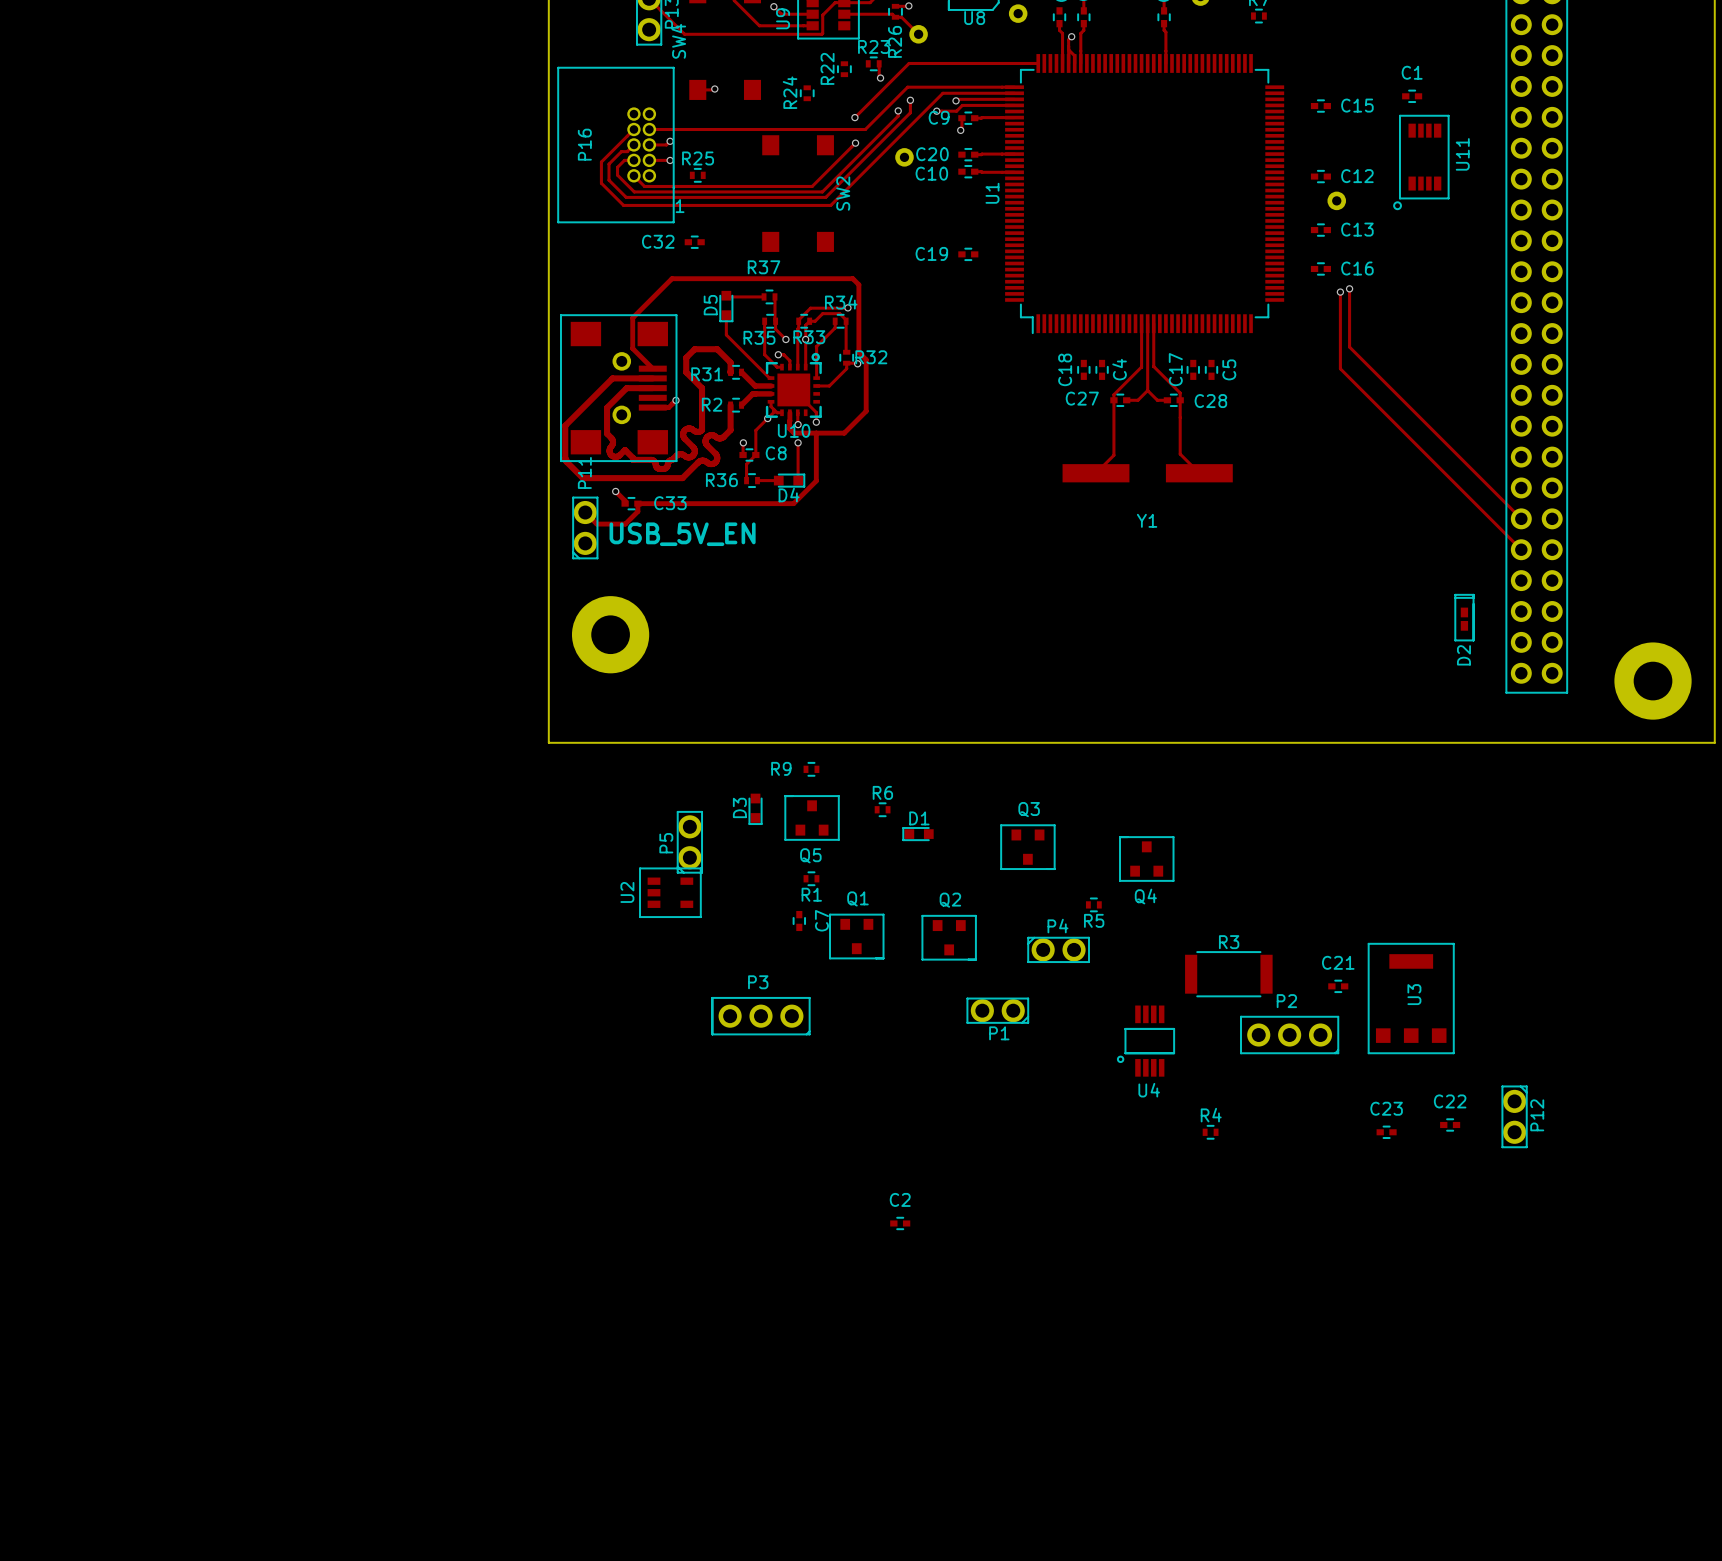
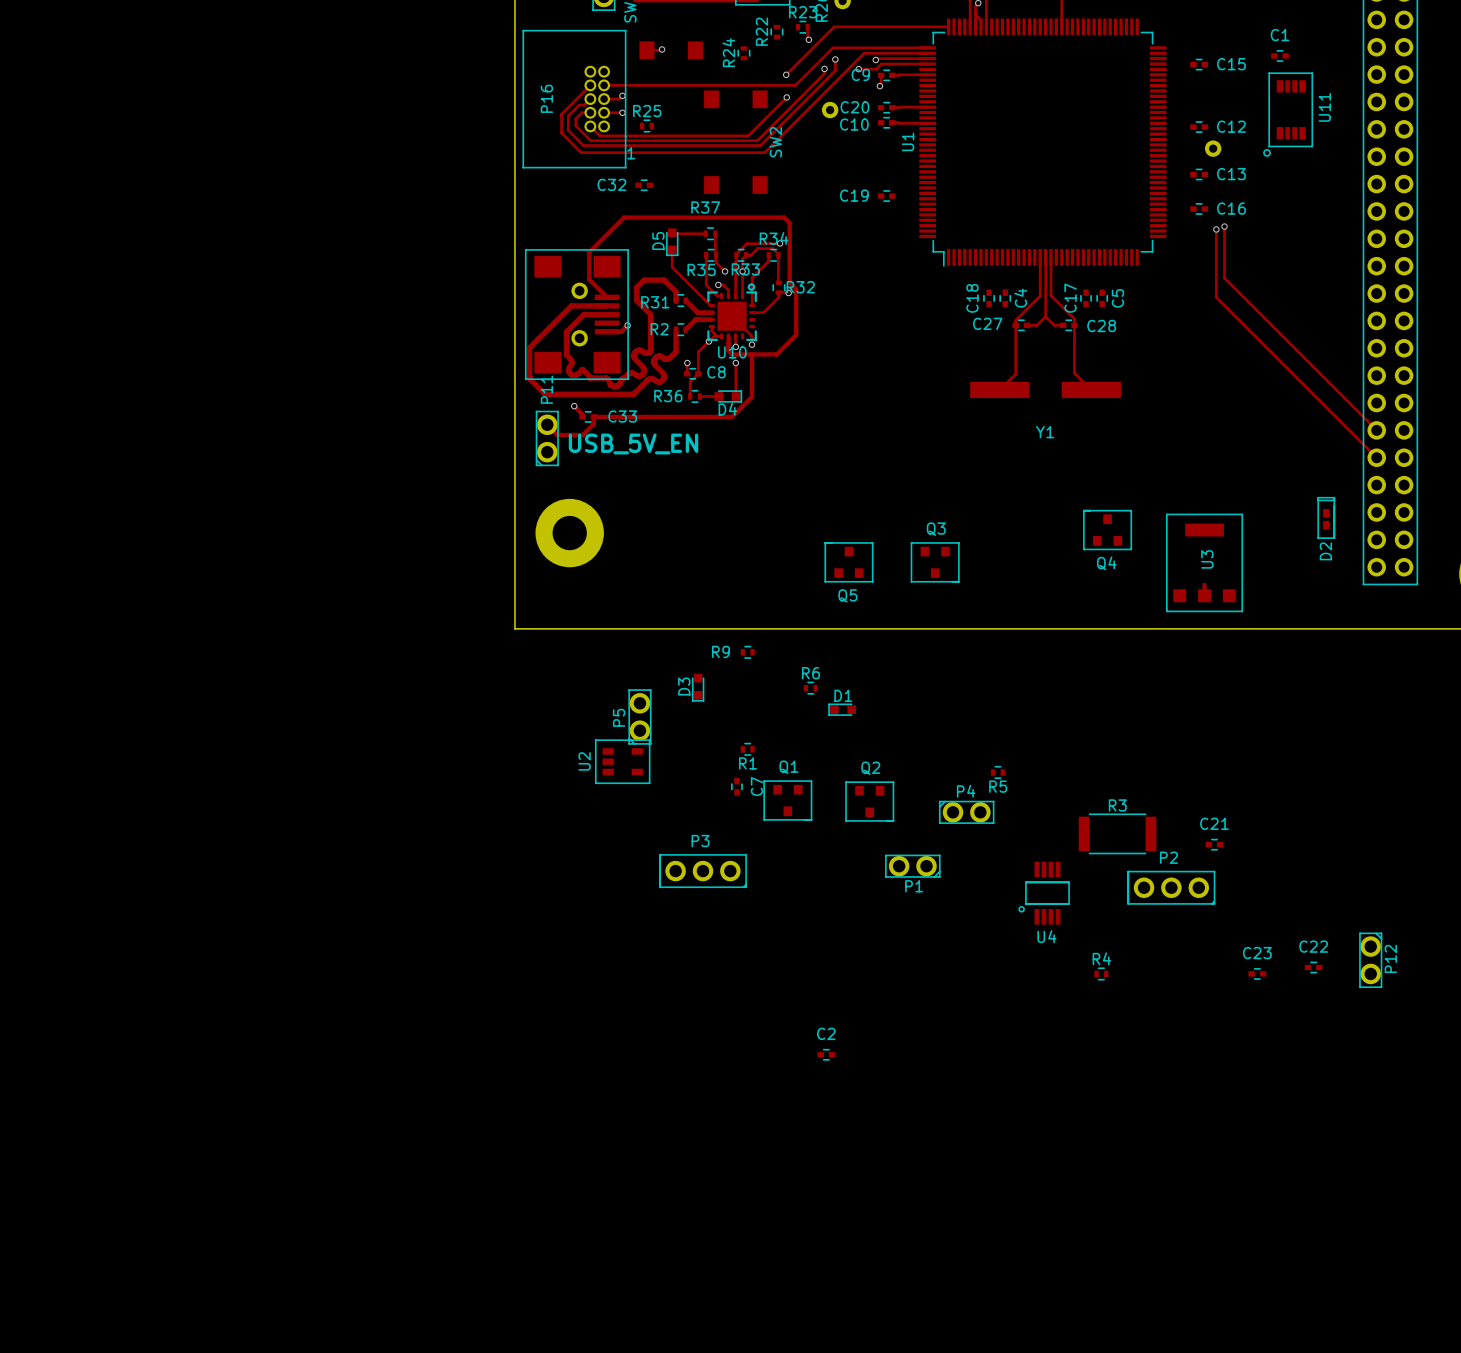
track: none -> (1204, 584) (1204, 595)
Q5 position: (812, 817) -> (848, 562)
Q3 position: (1027, 847) -> (935, 562)
Q4 position: (1146, 859) -> (1107, 530)
U3 position: (1411, 998) -> (1204, 562)

